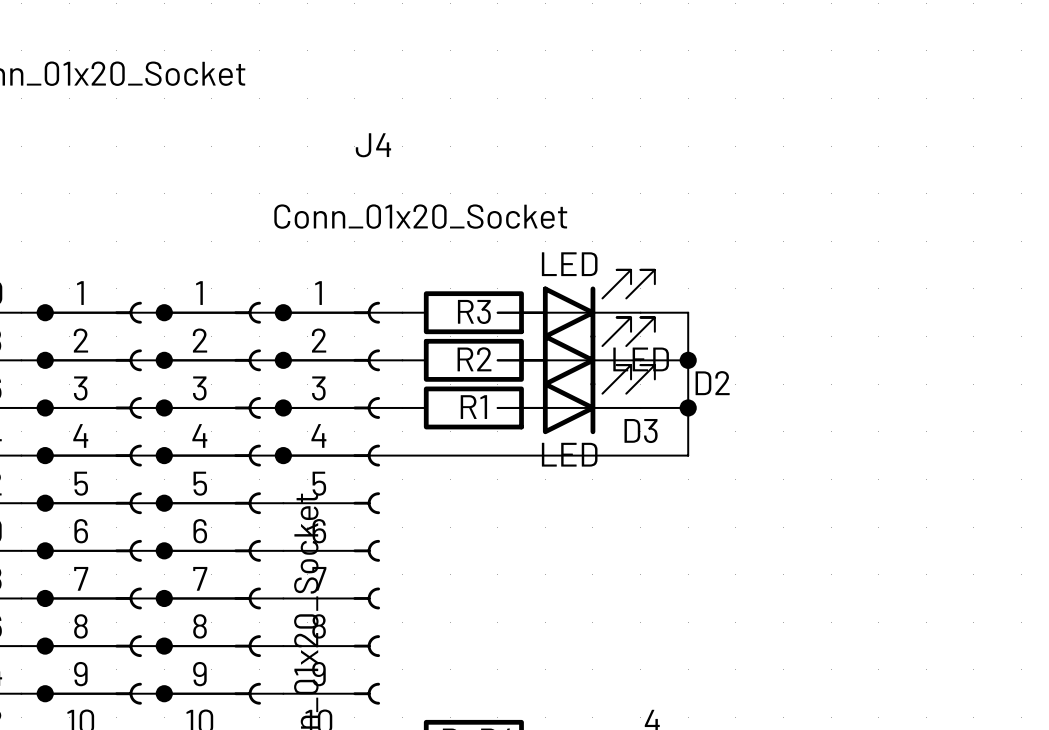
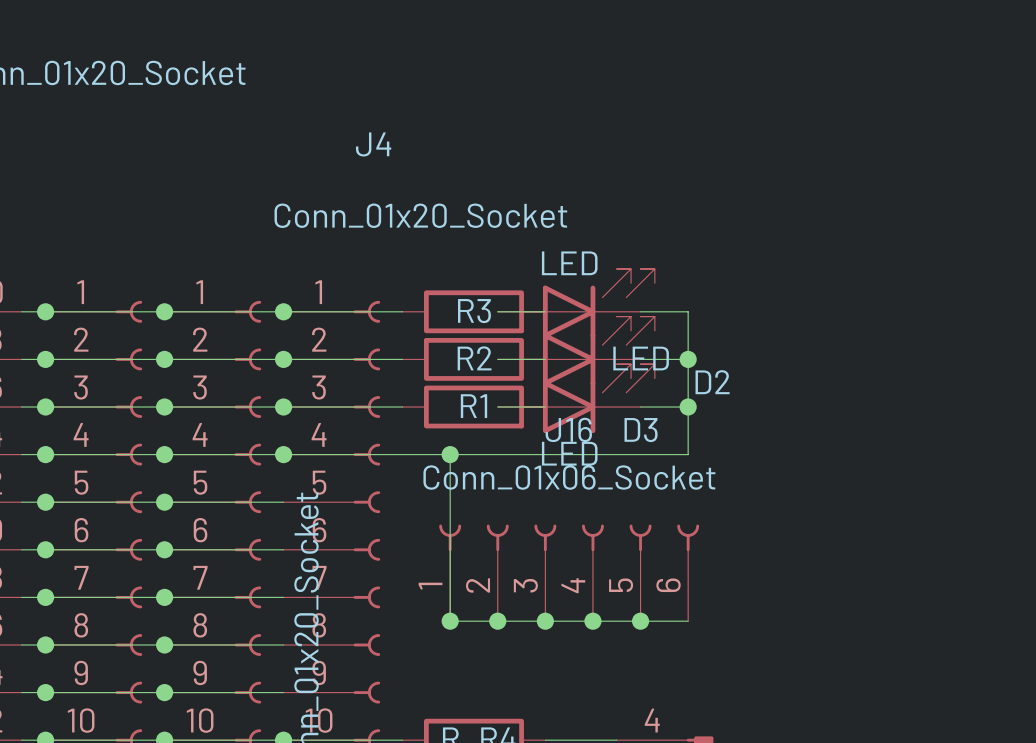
wire: none -> (450, 454) (450, 621) (688, 621)
junction: none -> (450, 454)
J16: none -> Conn_01x06_Socket (569, 572)
junction: none -> (450, 621)
junction: none -> (497, 621)
junction: none -> (545, 621)
junction: none -> (592, 621)
junction: none -> (640, 621)

